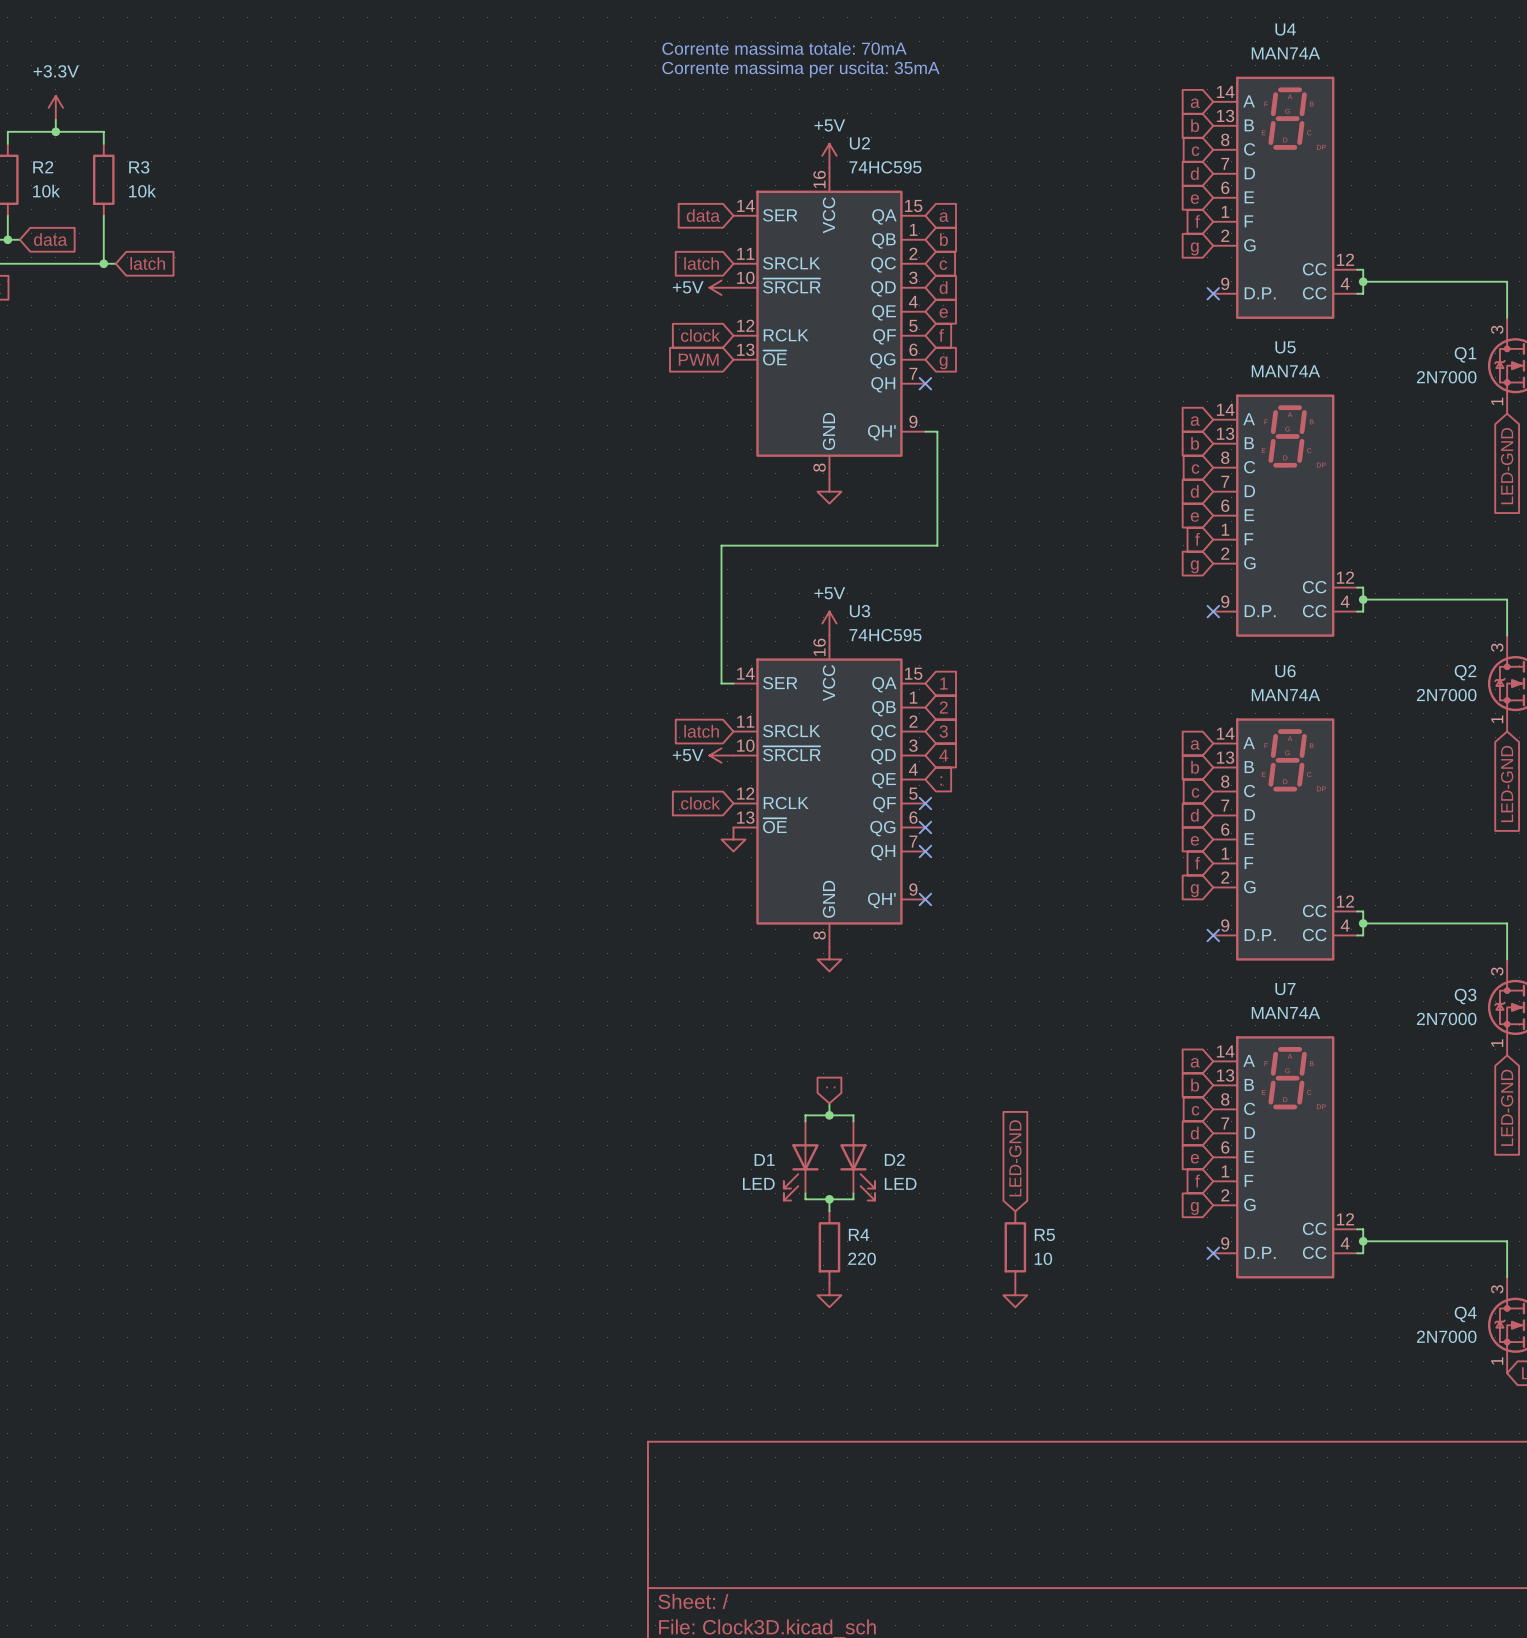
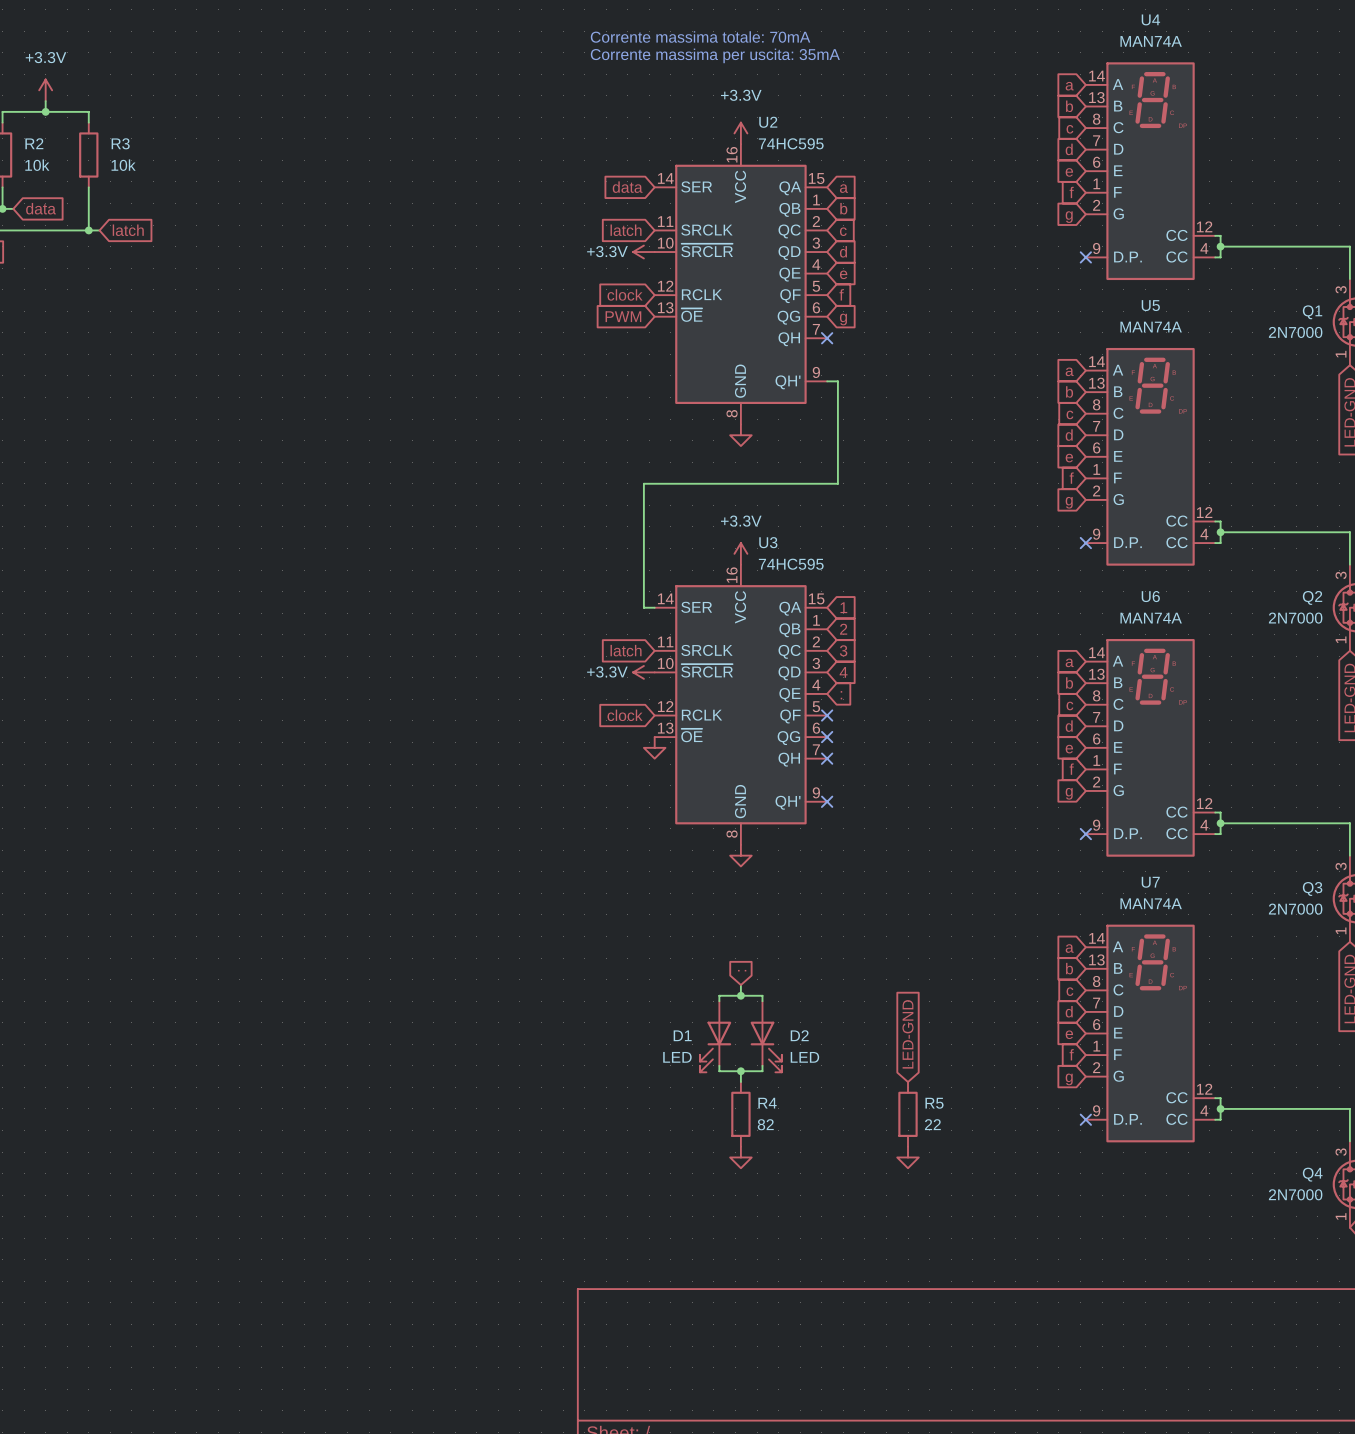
power symbol: +5V (829, 155) -> +3.3V (740, 133)
power symbol: +5V (721, 287) -> +3.3V (643, 252)
power symbol: +5V (829, 623) -> +3.3V (740, 553)
power symbol: +5V (721, 755) -> +3.3V (643, 672)
R4 value: 220 (862, 1258) -> 82 (765, 1124)
R5 value: 10 (1043, 1258) -> 22 (932, 1124)

